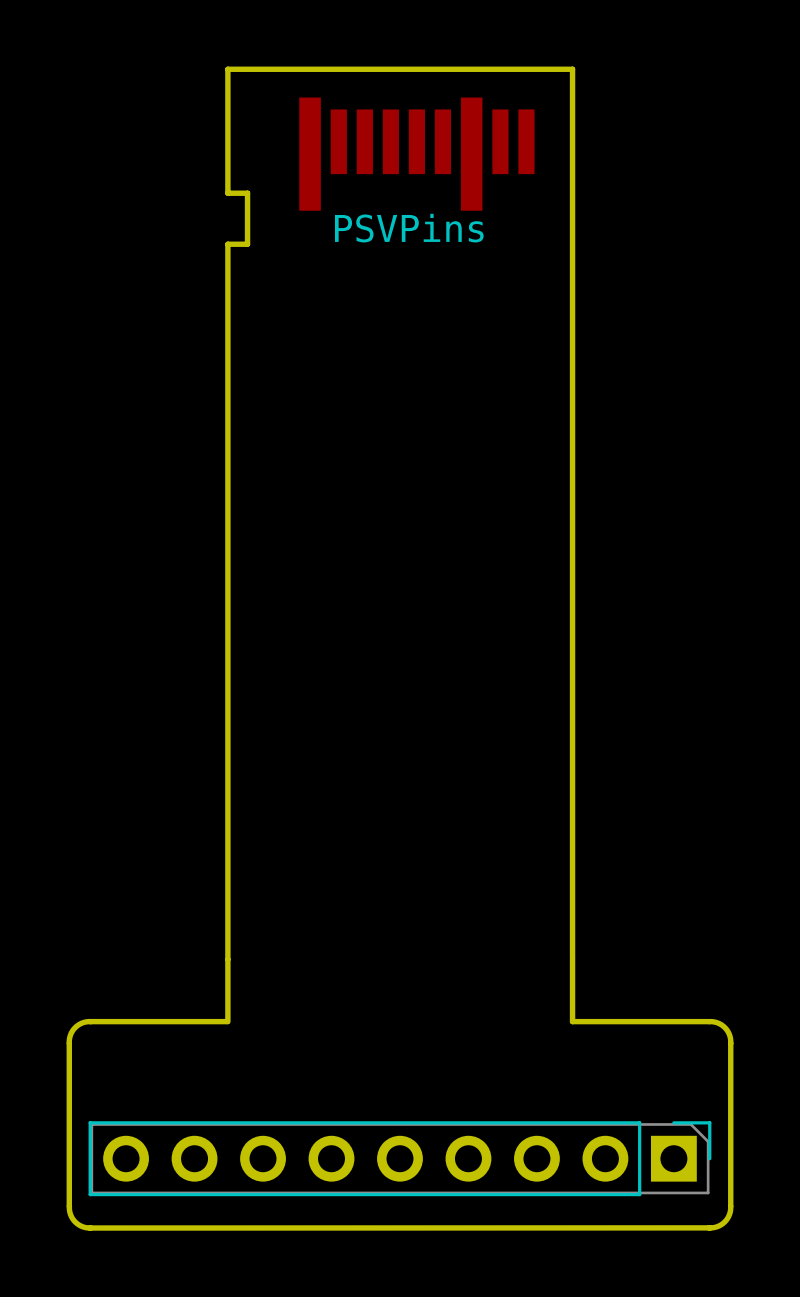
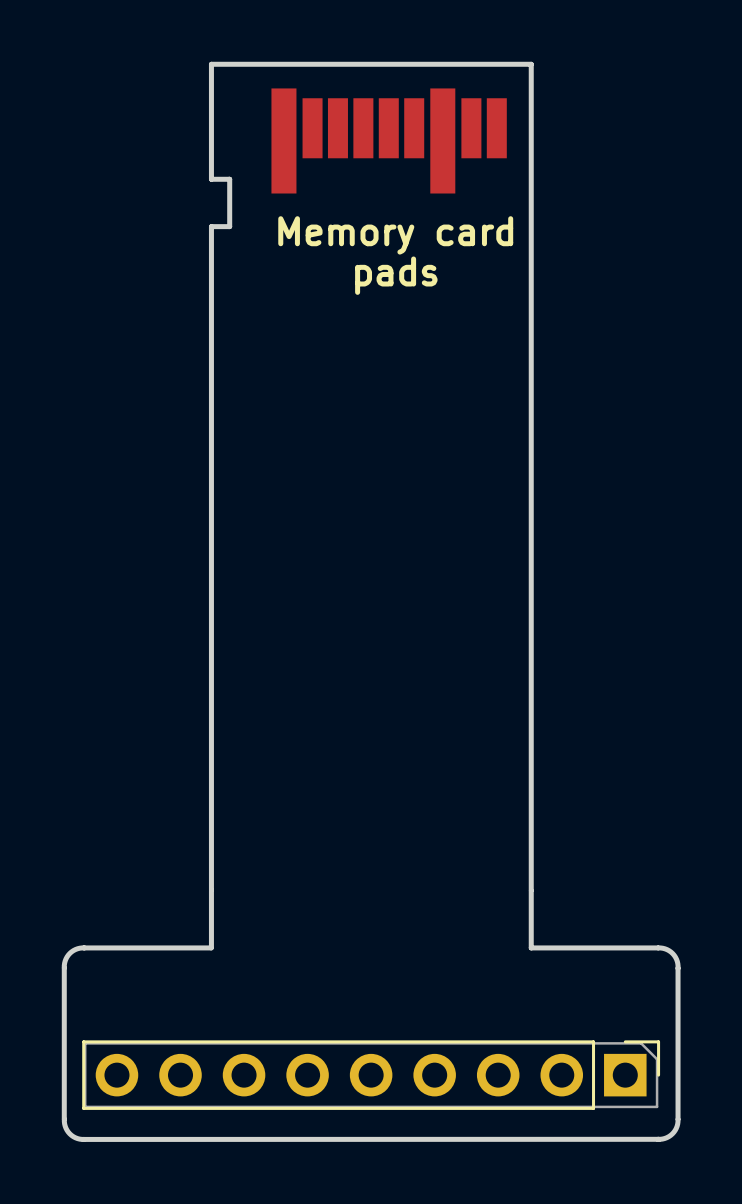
part: none -> (389, 140)
PSVPins: (416, 154) -> none
text: none -> Memory card (395, 235)
text: none -> pads (396, 275)

